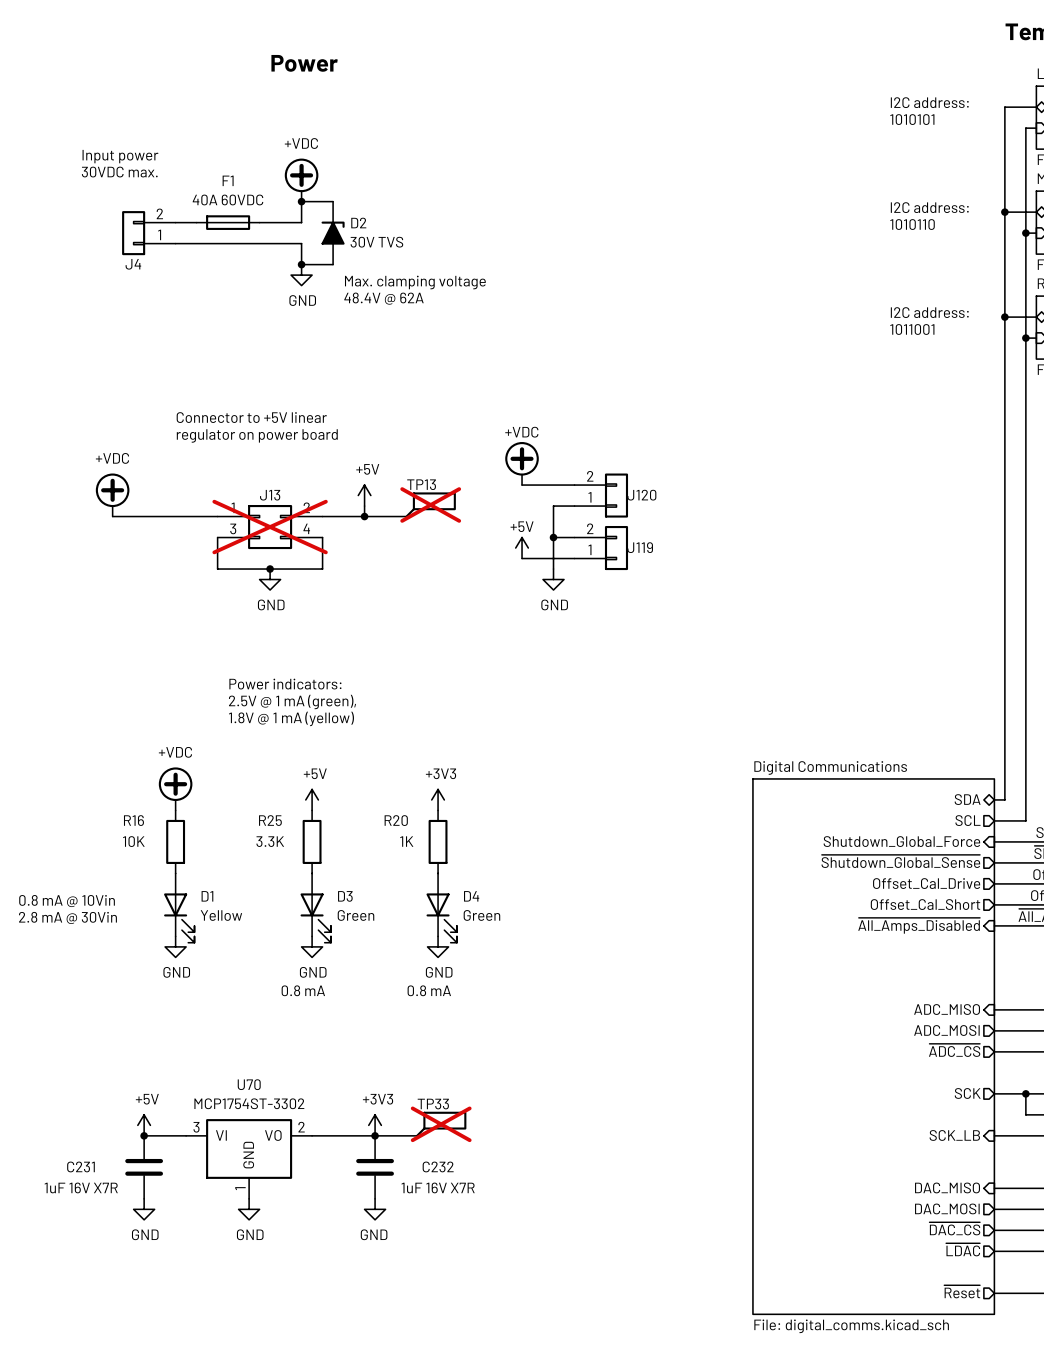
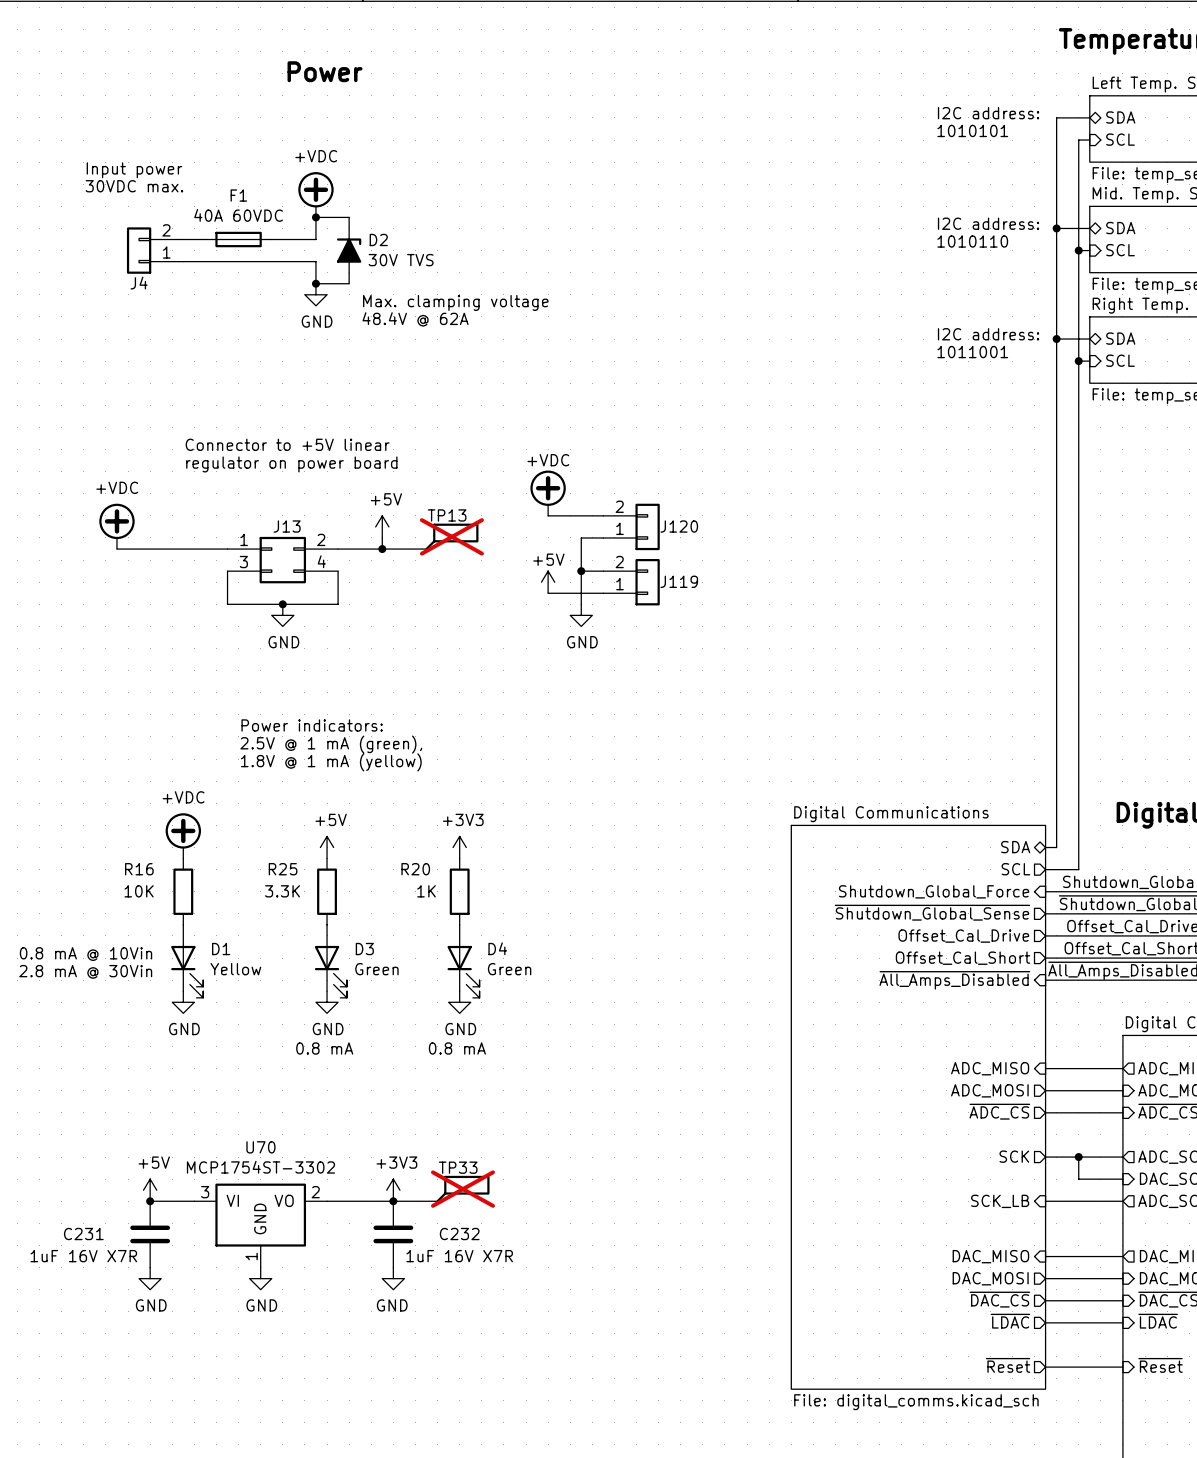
J13 do-not-place cross: (270, 527) -> none

